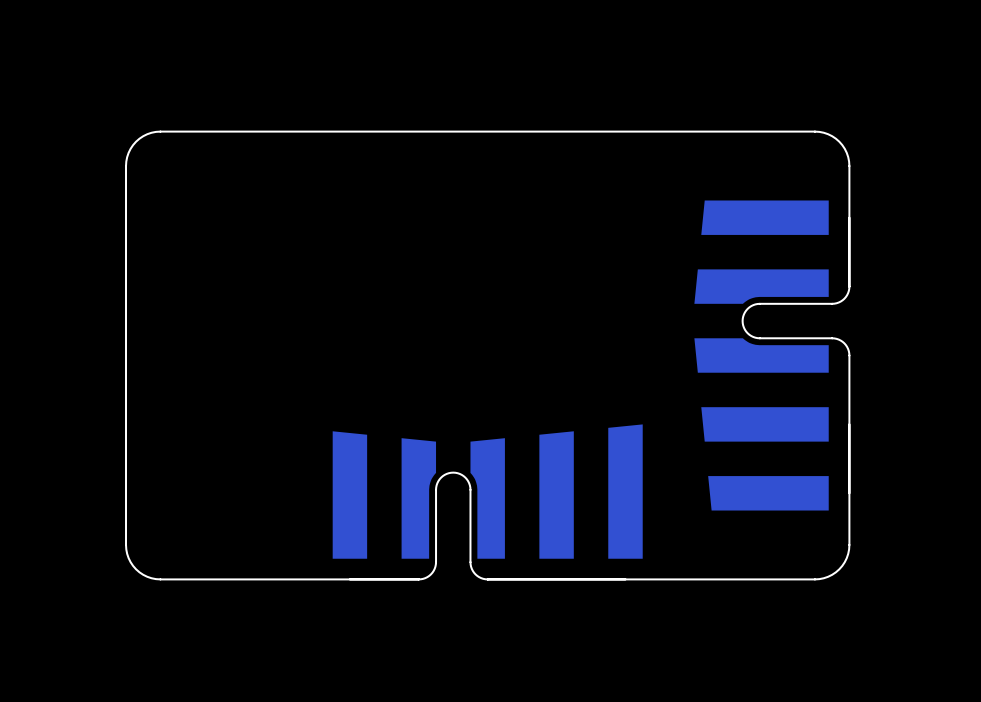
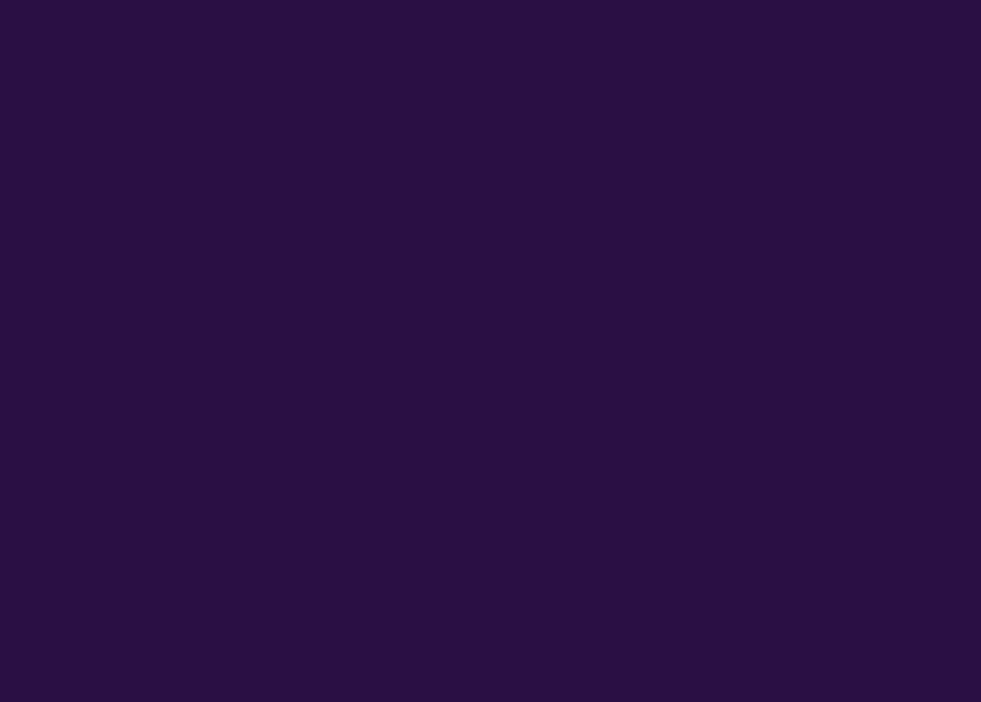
board edge: (849, 286) (849, 161) (842, 145) (835, 138) (823, 132) (160, 131) (147, 134) (139, 138) (130, 148) (126, 166) (126, 544) (130, 562) (143, 574) (160, 579) (418, 579) -> none
part: (772, 355) -> none
board edge: (849, 424) (849, 549) (842, 565) (828, 576) (814, 579) (487, 579) -> none
part: (487, 502) -> none

